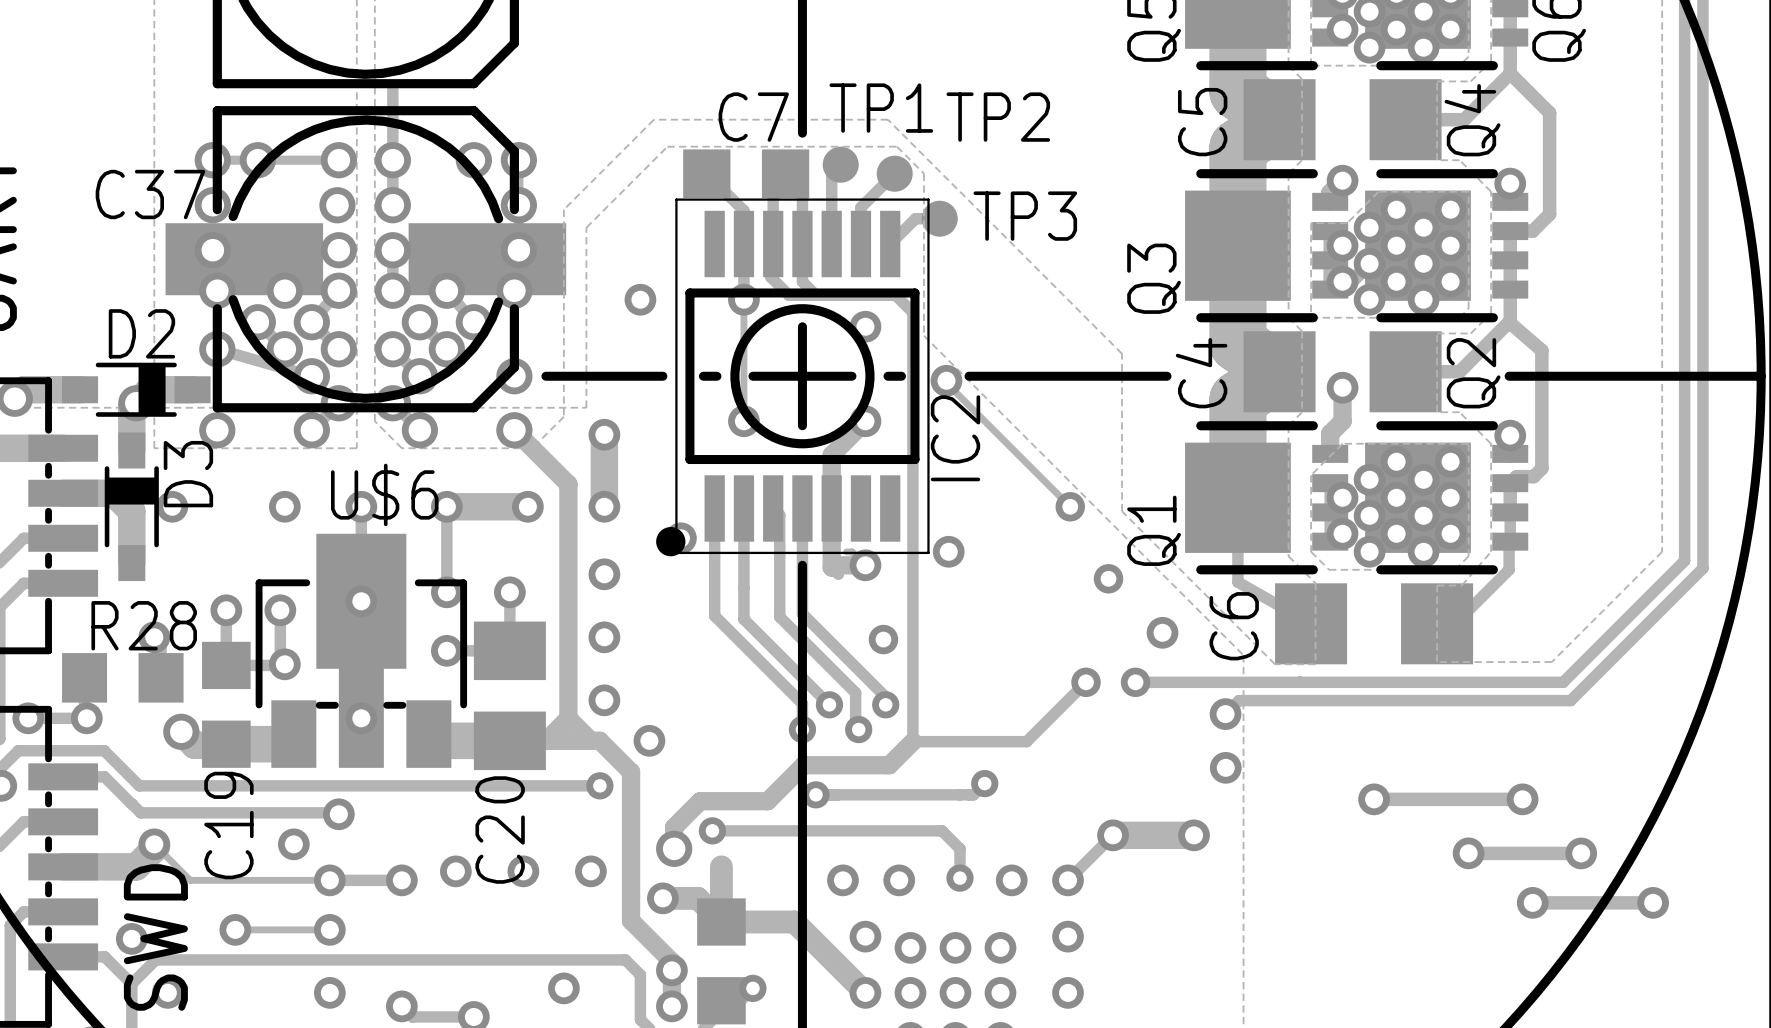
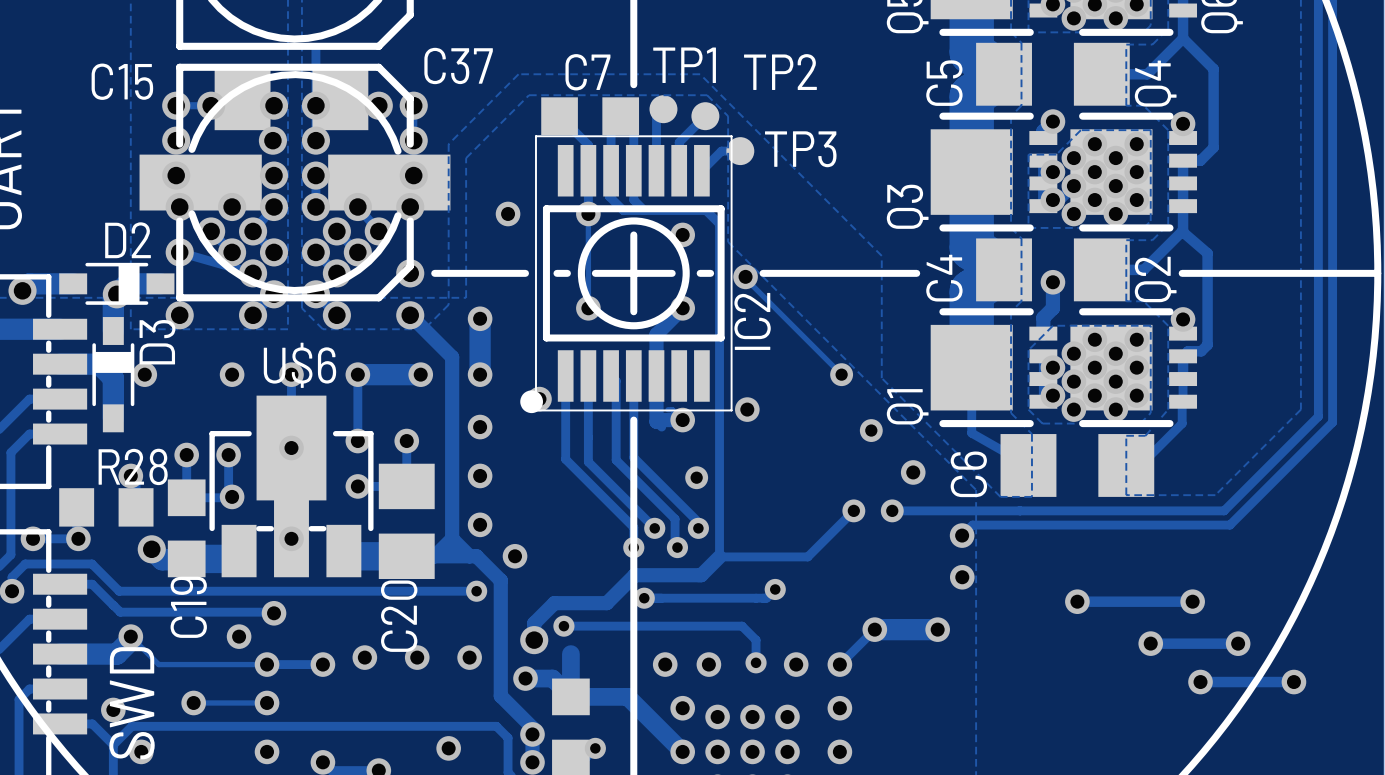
C15: none -> (291, 98)
C37 name position: C37 (150, 194) -> C37 (458, 65)

